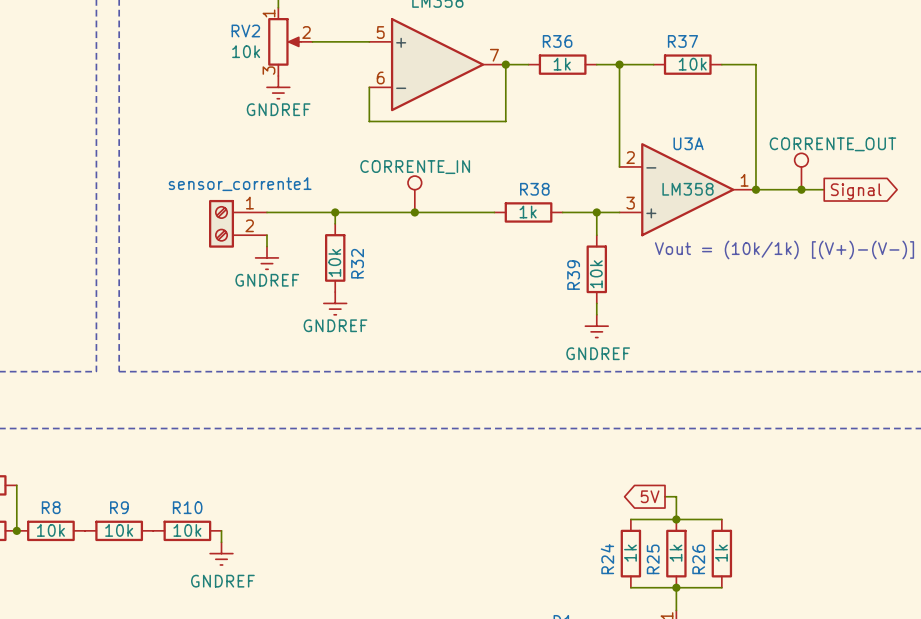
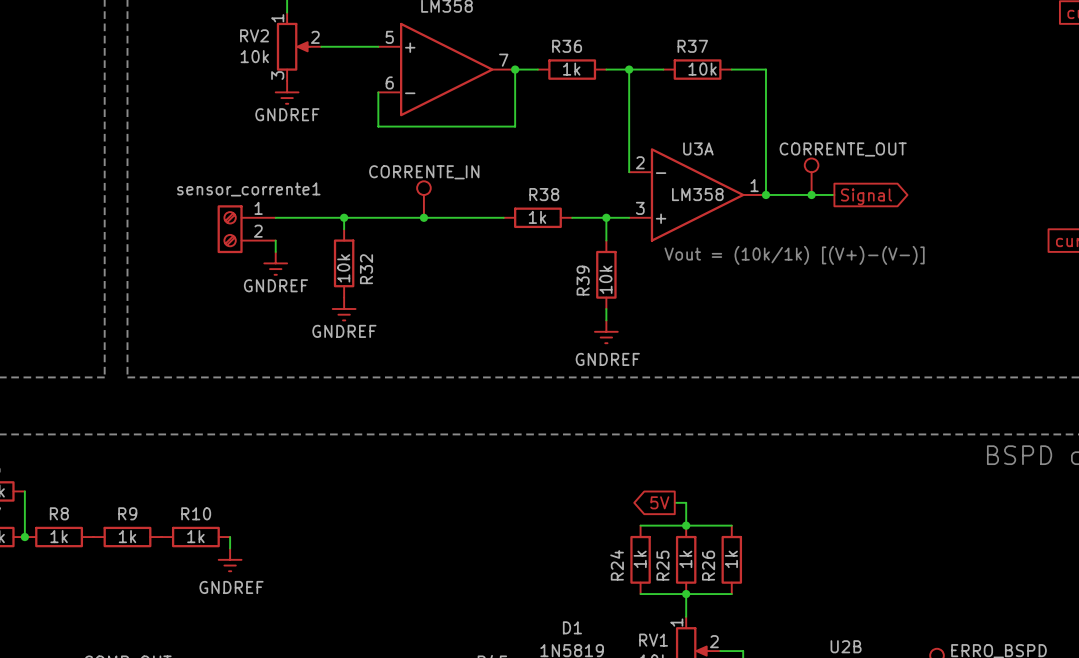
R8 value: 10k (50, 530) -> 1k (59, 536)
R9 value: 10k (119, 530) -> 1k (127, 536)
R10 value: 10k (187, 530) -> 1k (195, 536)

